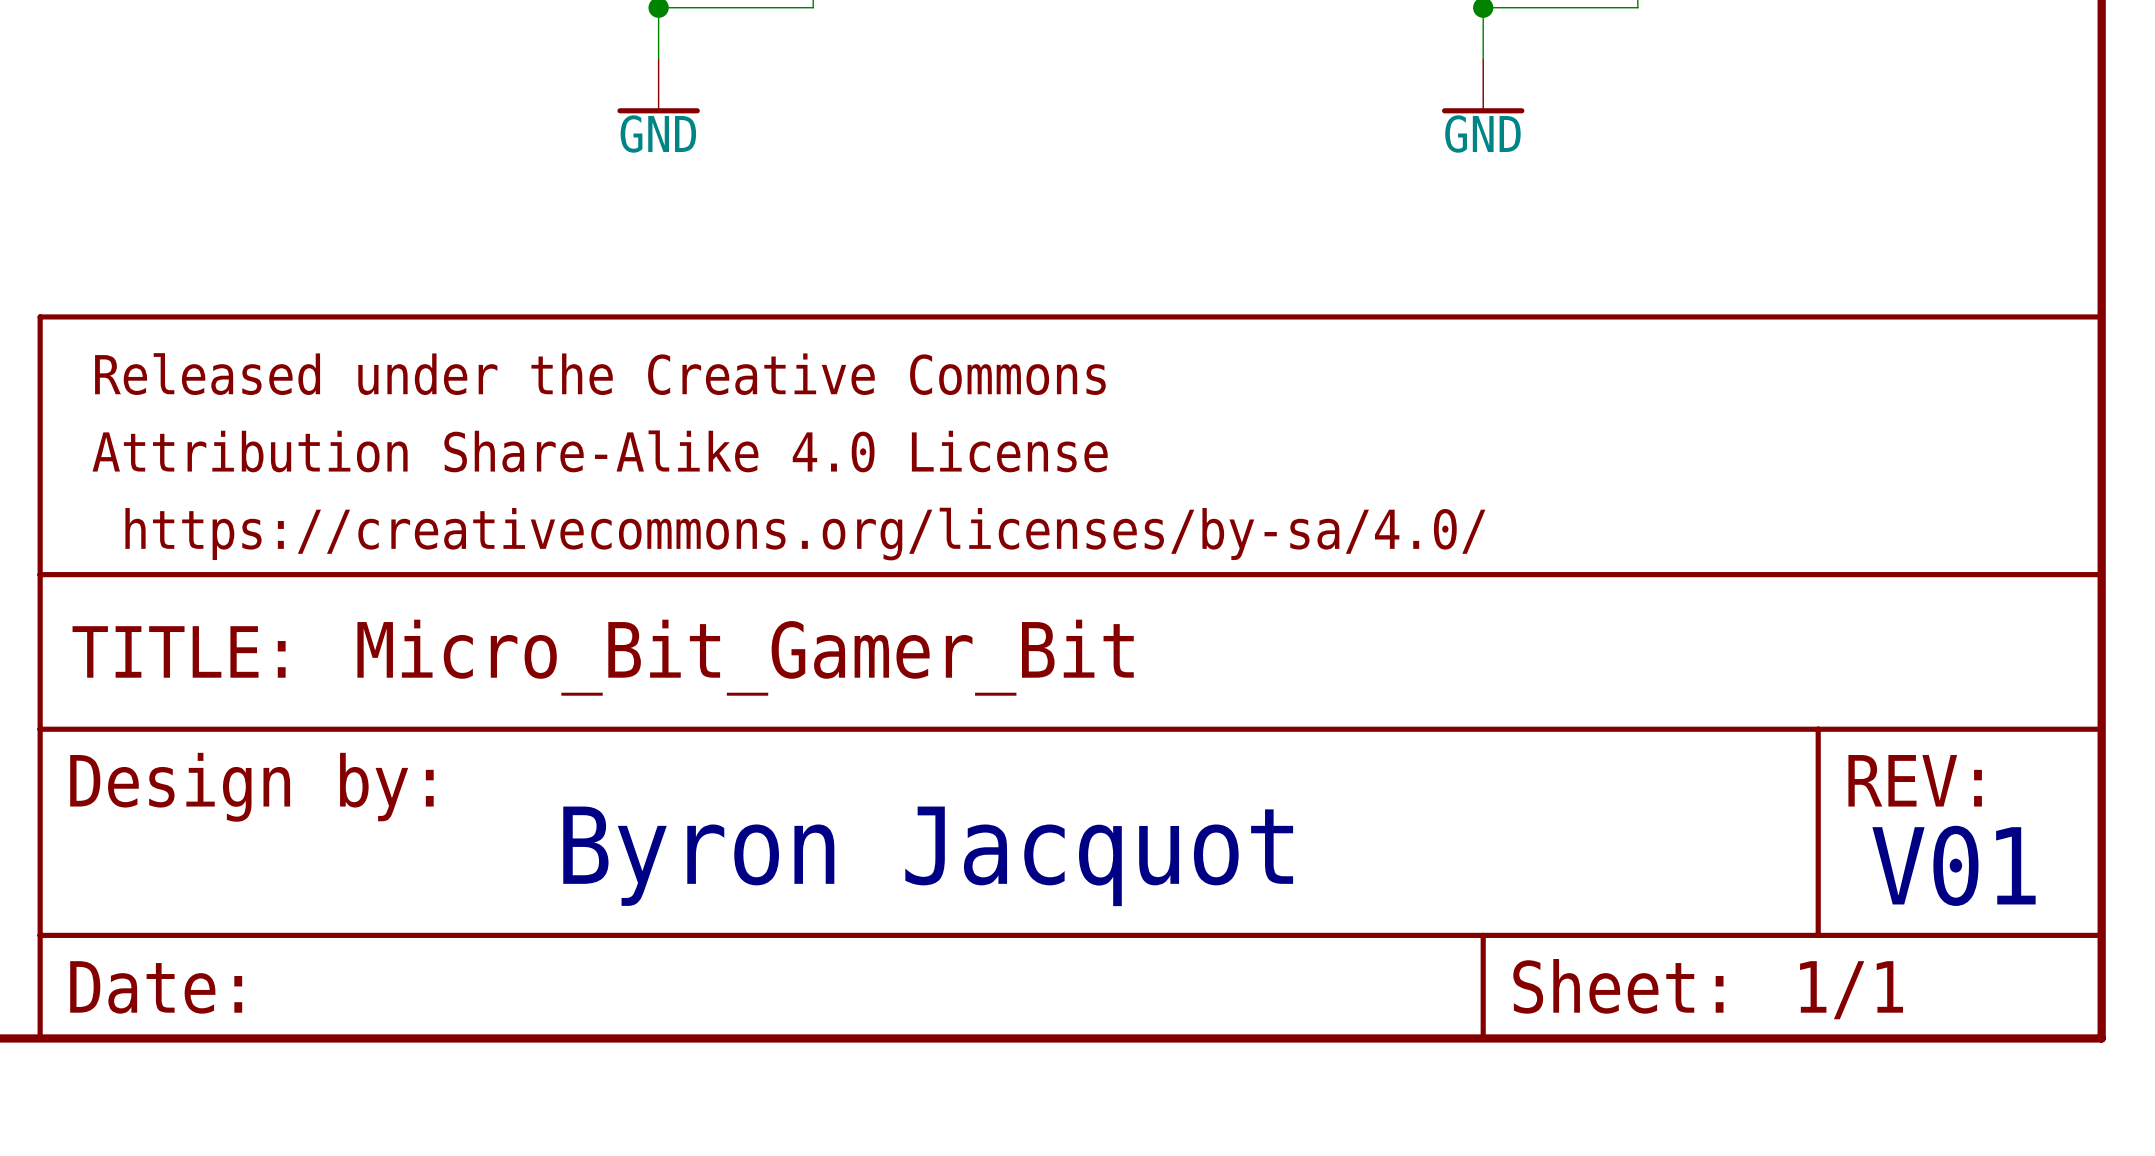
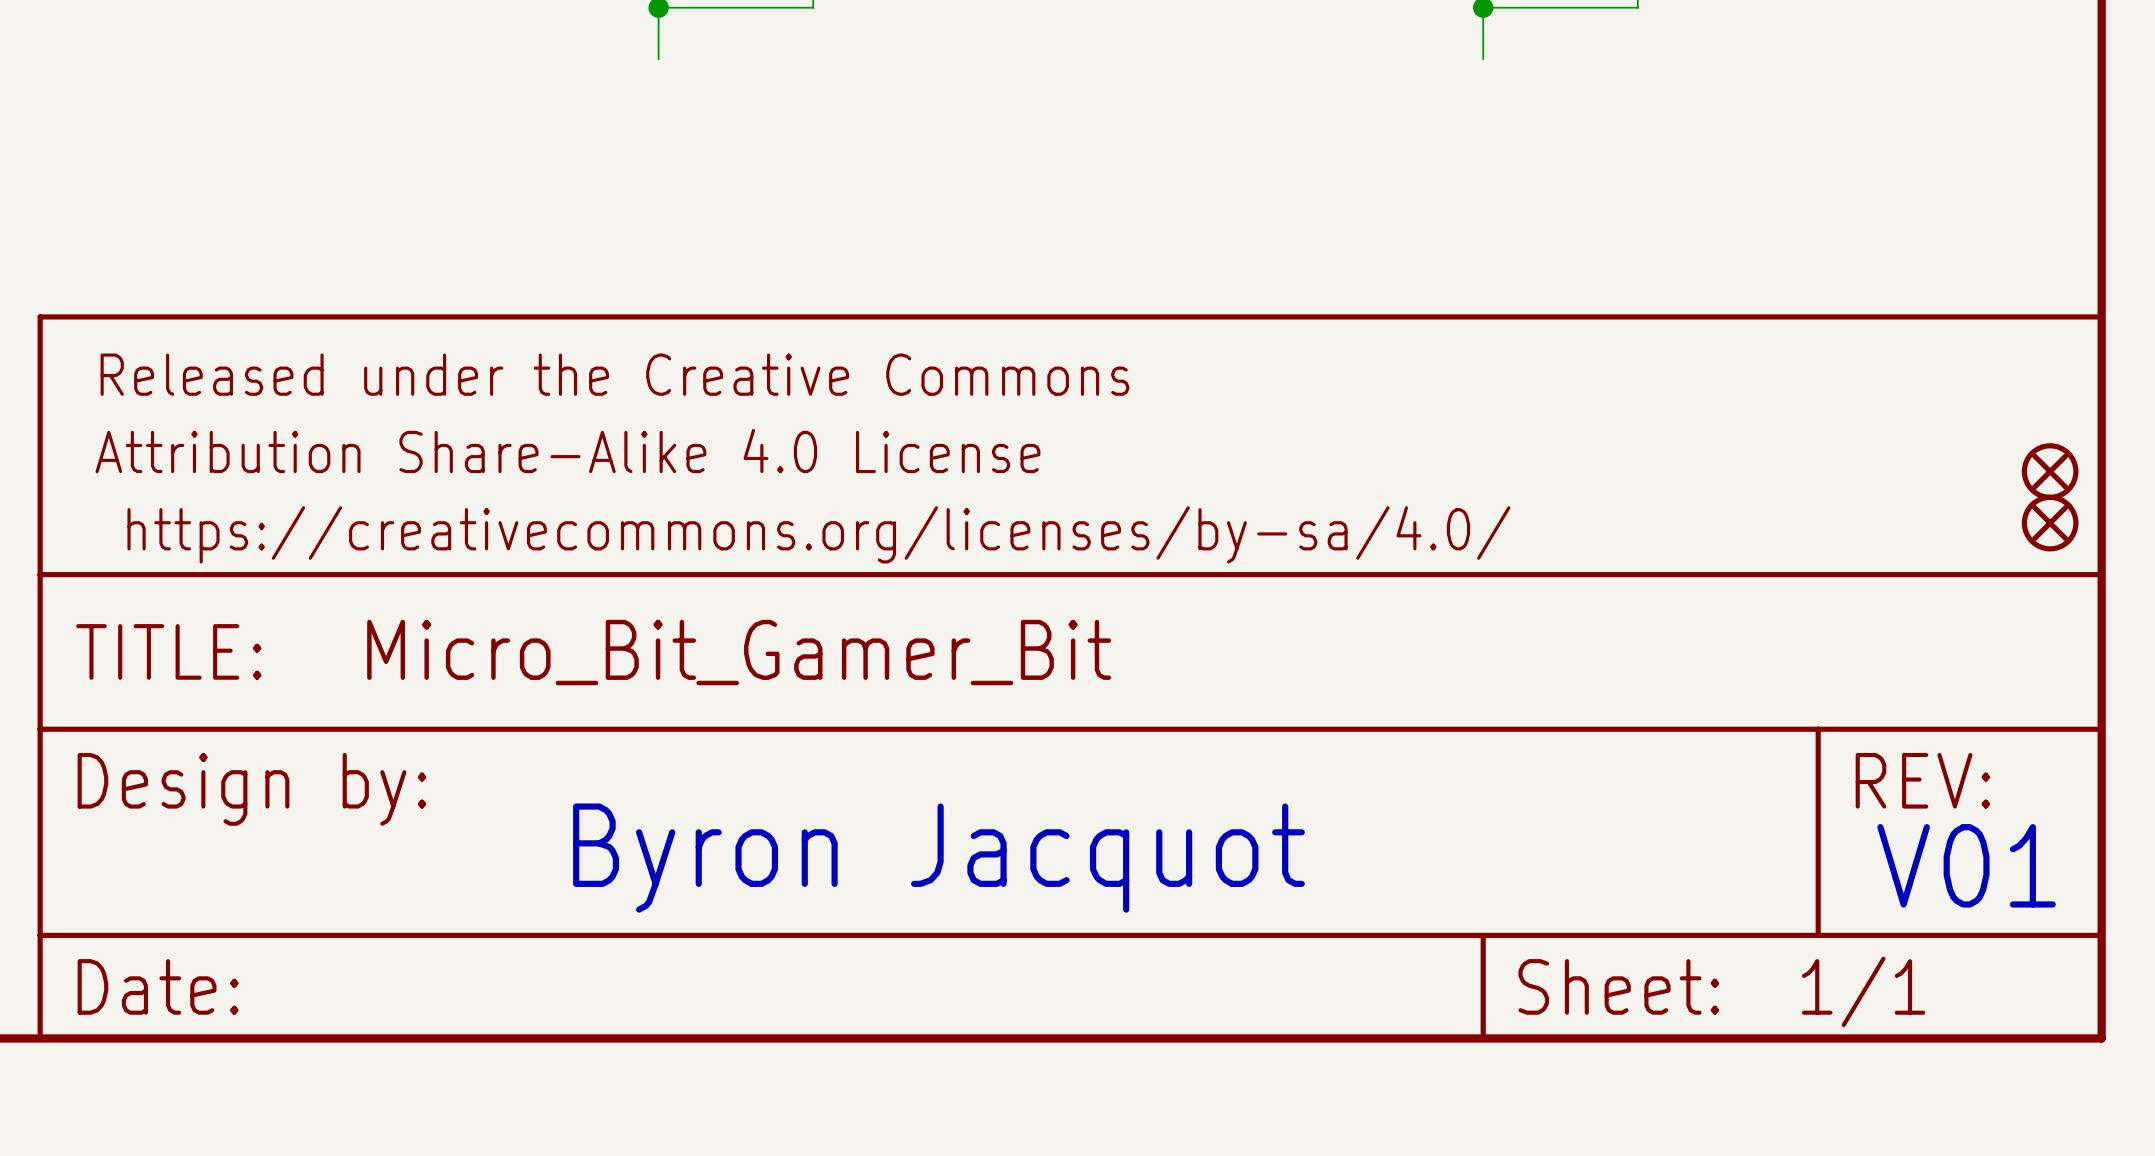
power symbol: GND (658, 86) -> none
power symbol: GND (1483, 86) -> none
part: none -> (2050, 471)
part: none -> (2050, 523)

